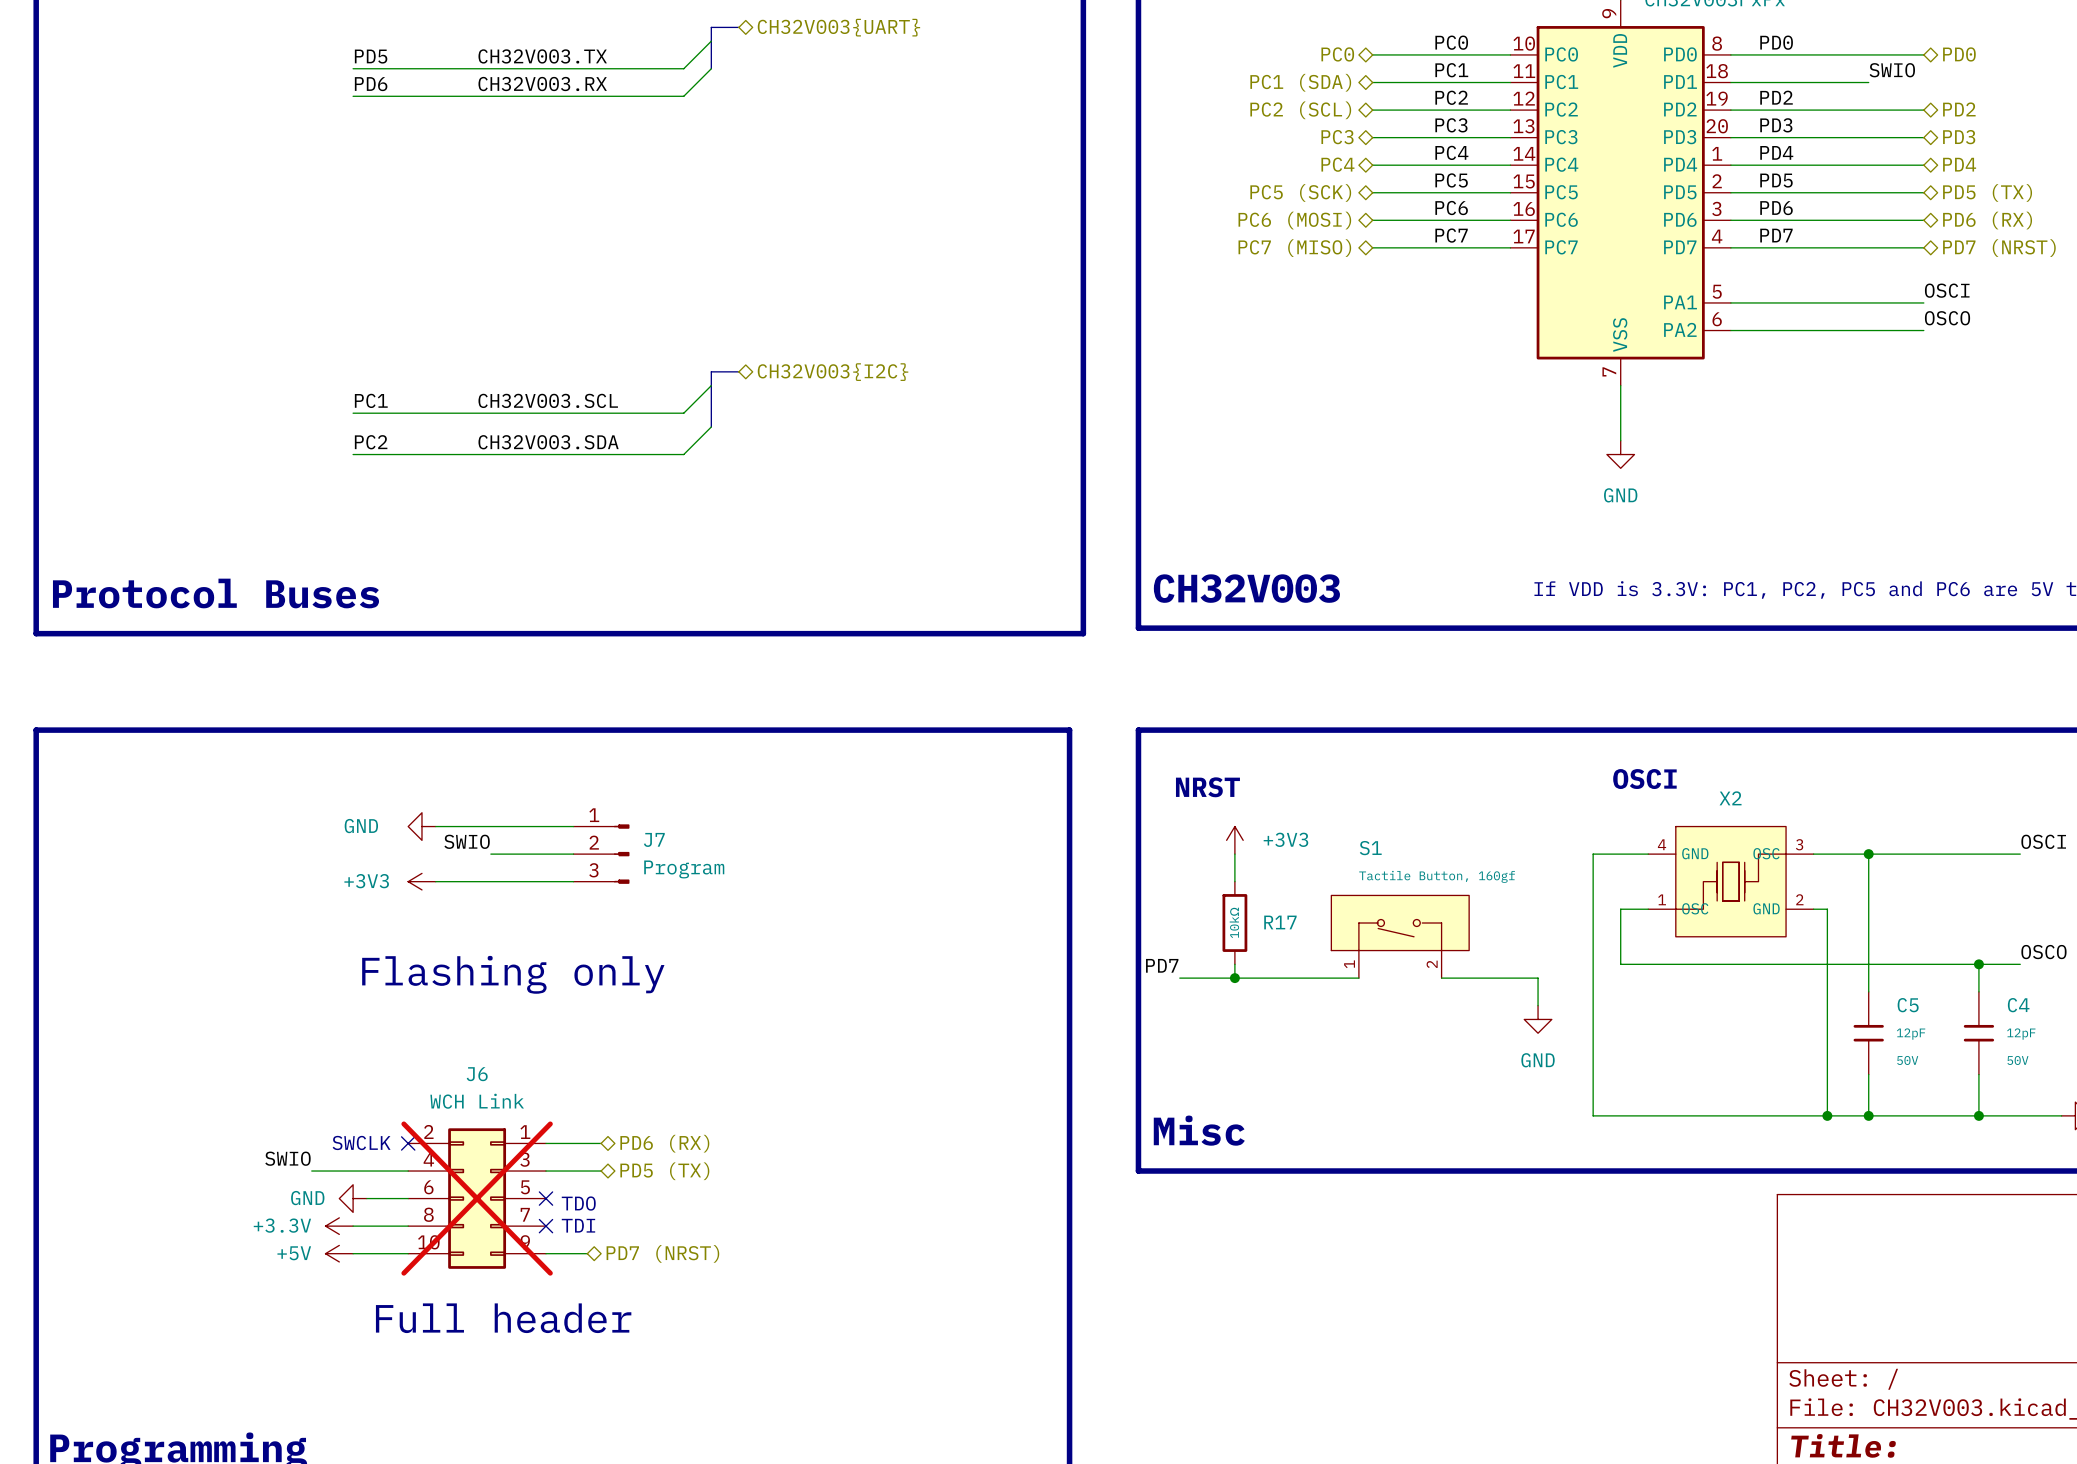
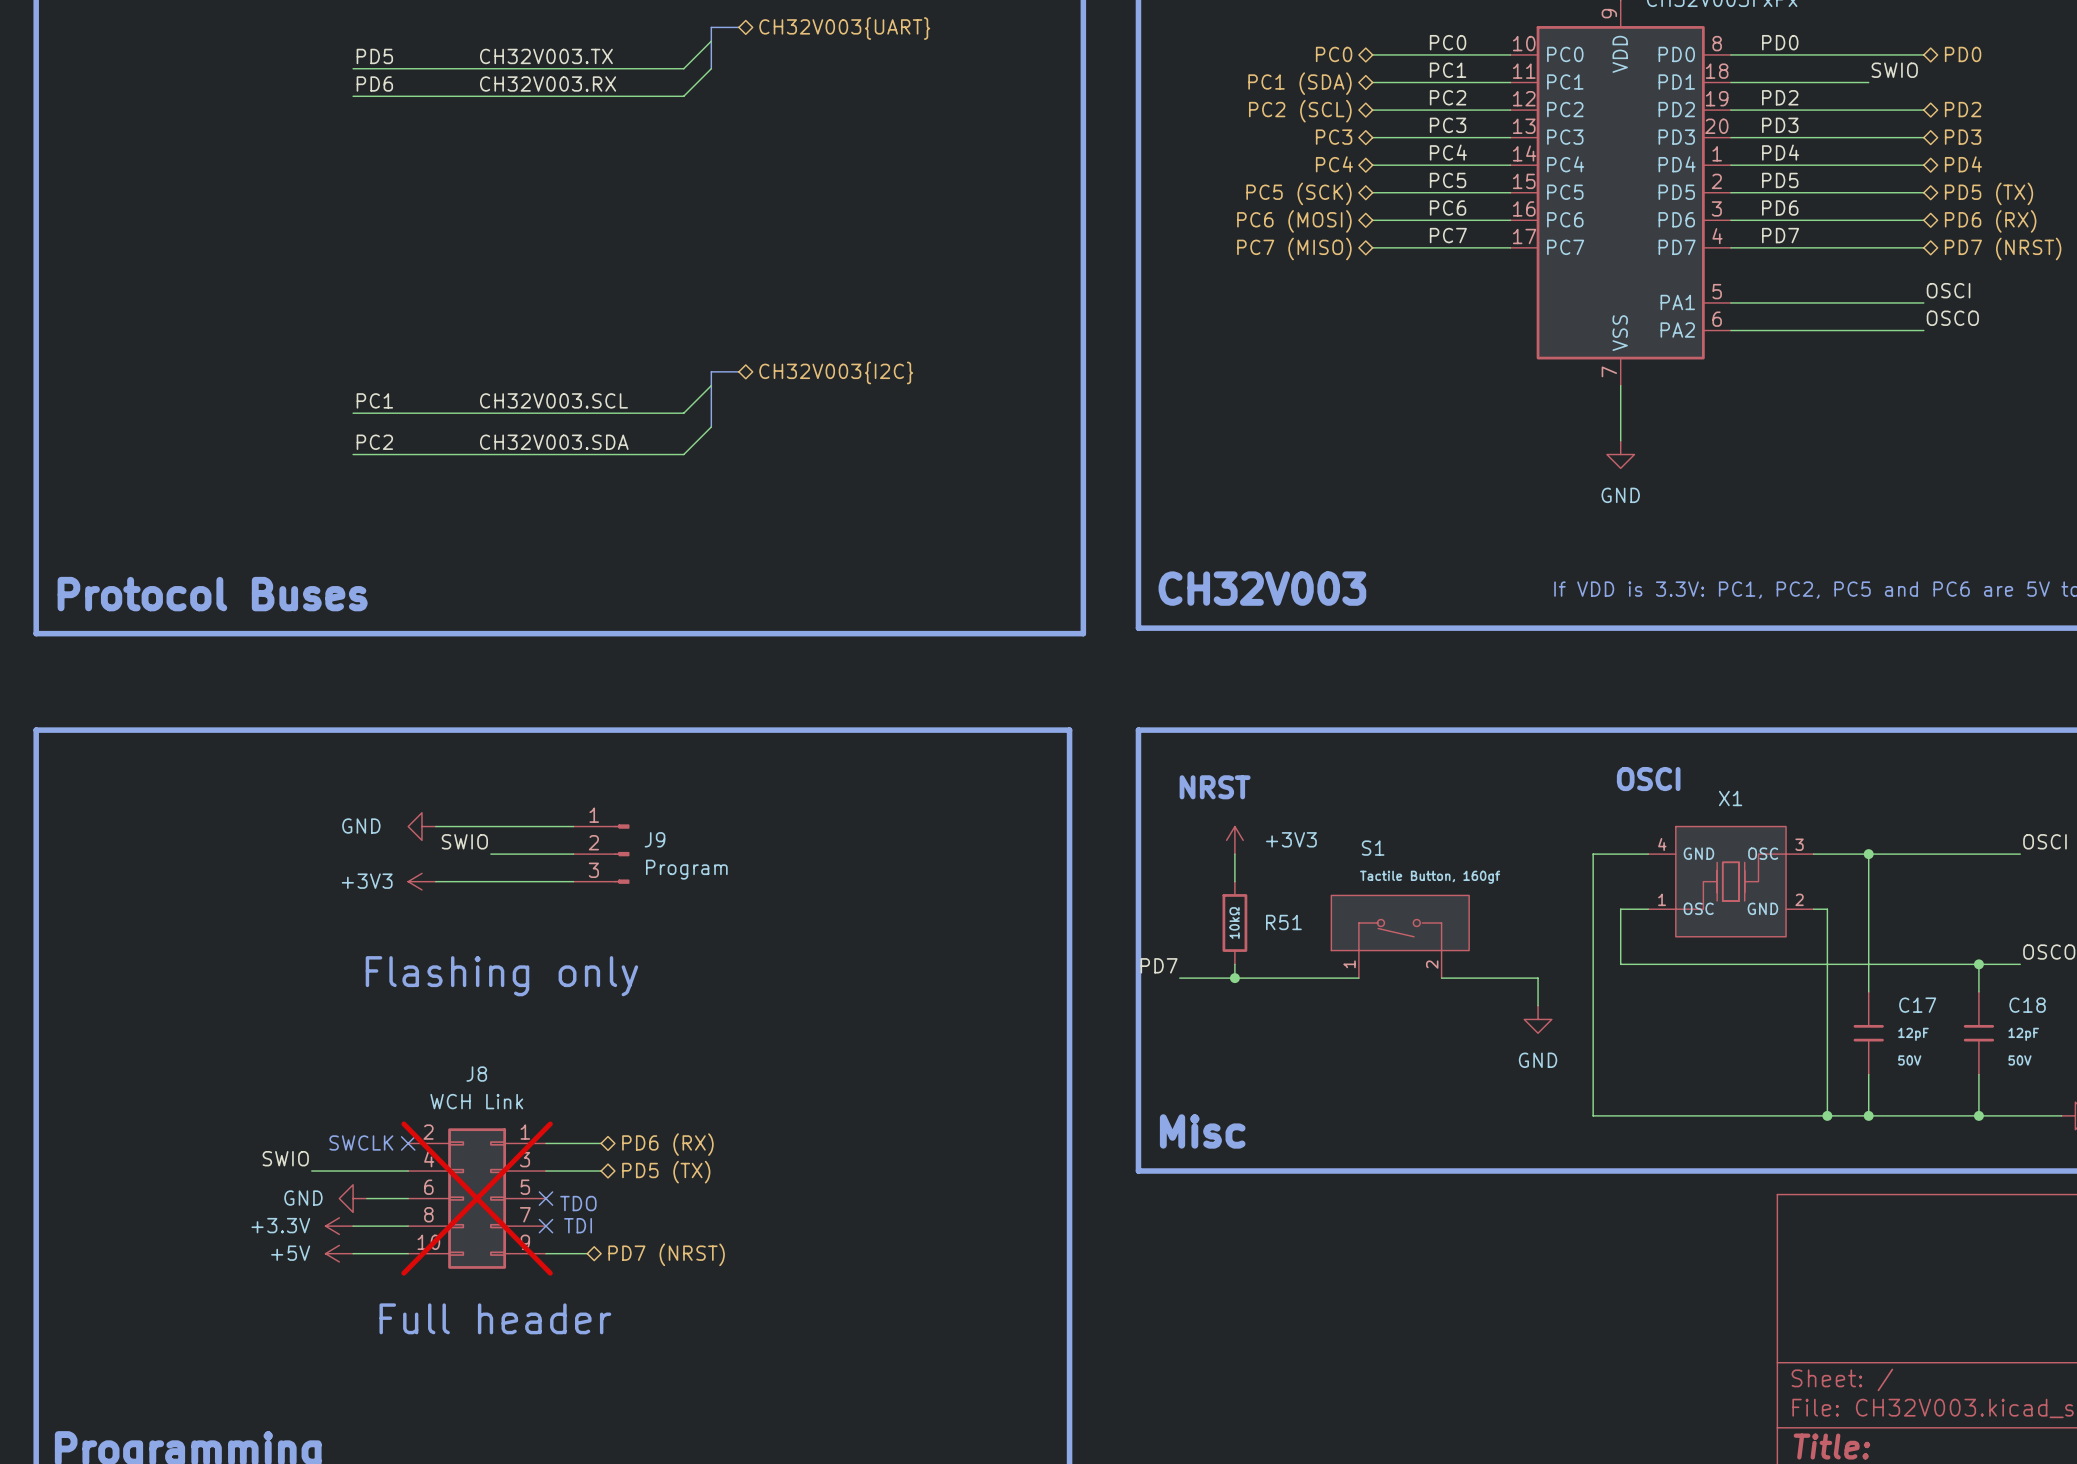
X2 name: X2 (1730, 798) -> X1 (1730, 798)
J7 name: J7 (654, 839) -> J9 (655, 839)
R17 name: R17 (1280, 922) -> R51 (1283, 922)
C5 name: C5 (1908, 1005) -> C17 (1917, 1005)
C4 name: C4 (2018, 1005) -> C18 (2027, 1005)
J6 name: J6 (477, 1074) -> J8 (476, 1074)

